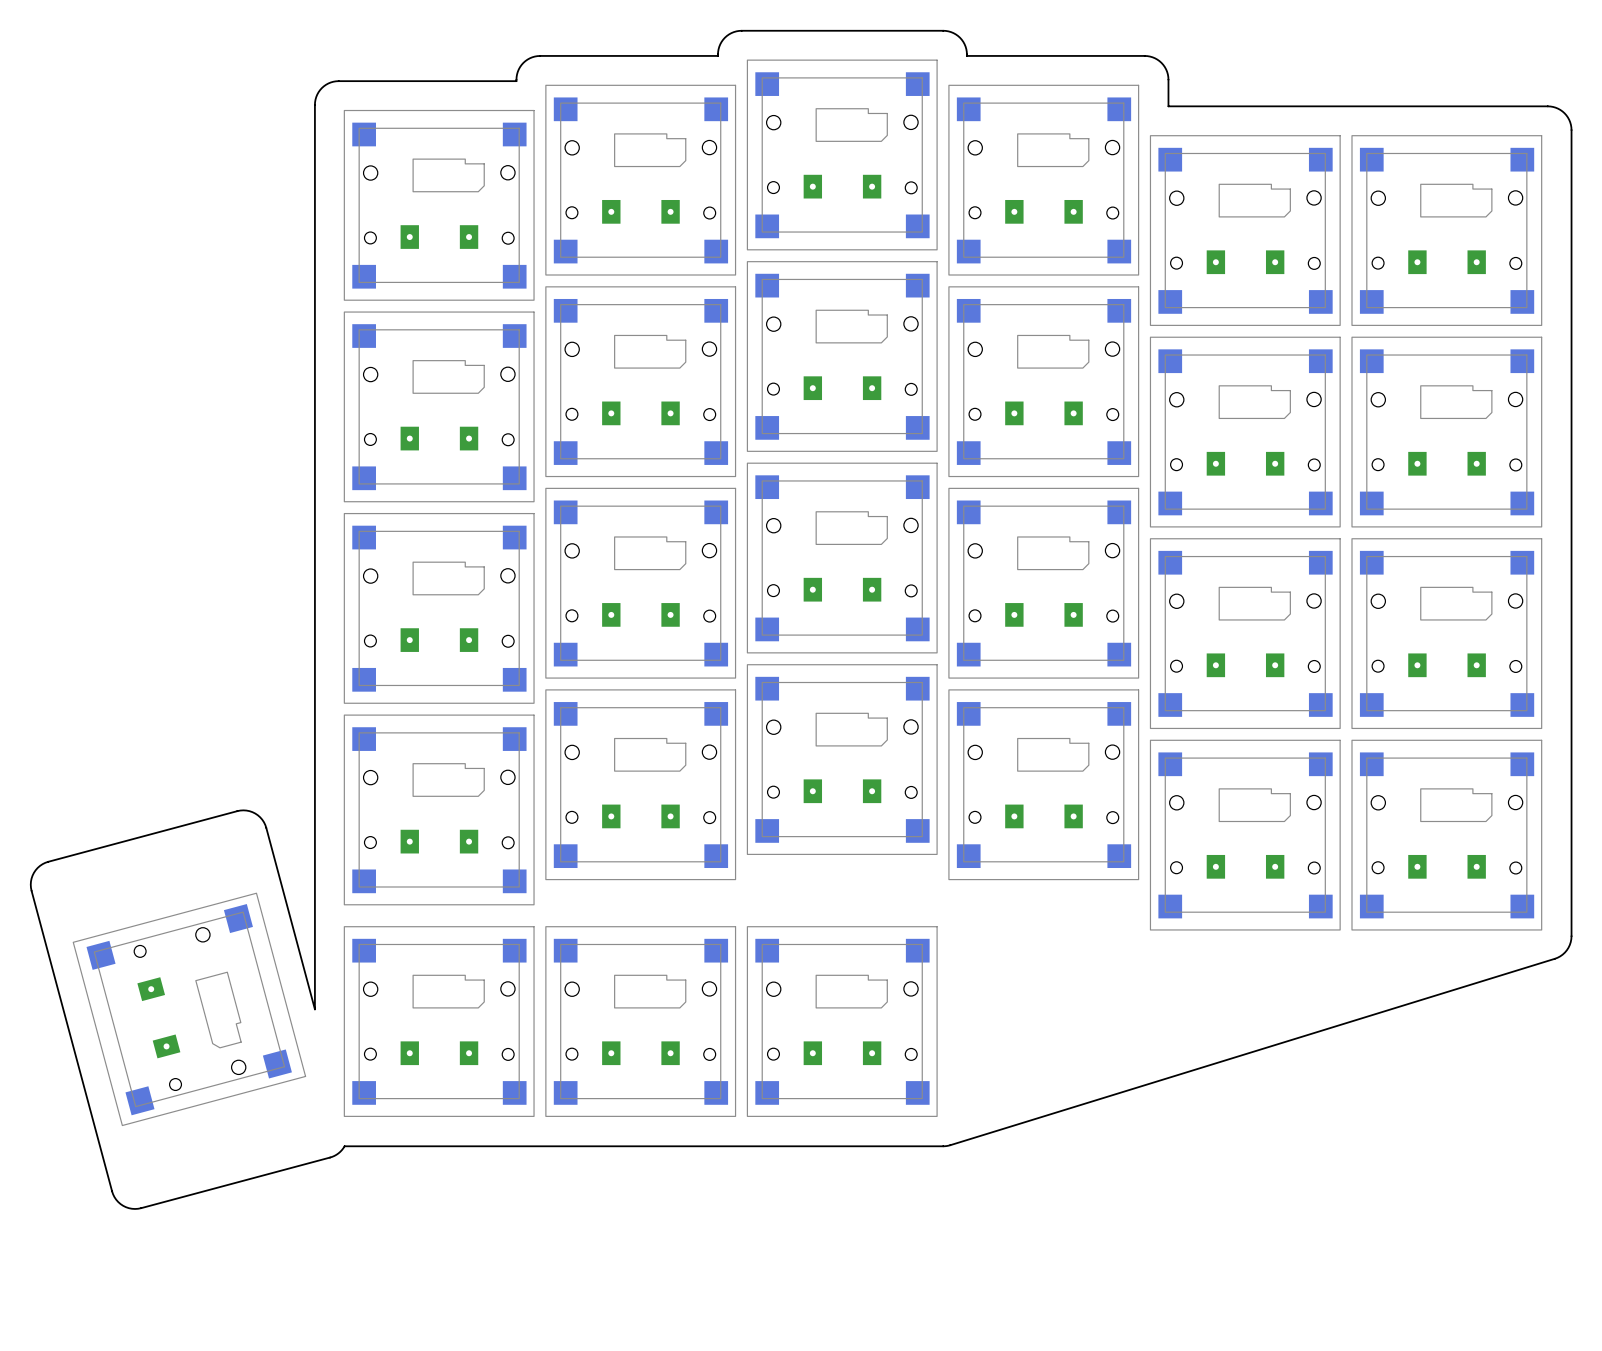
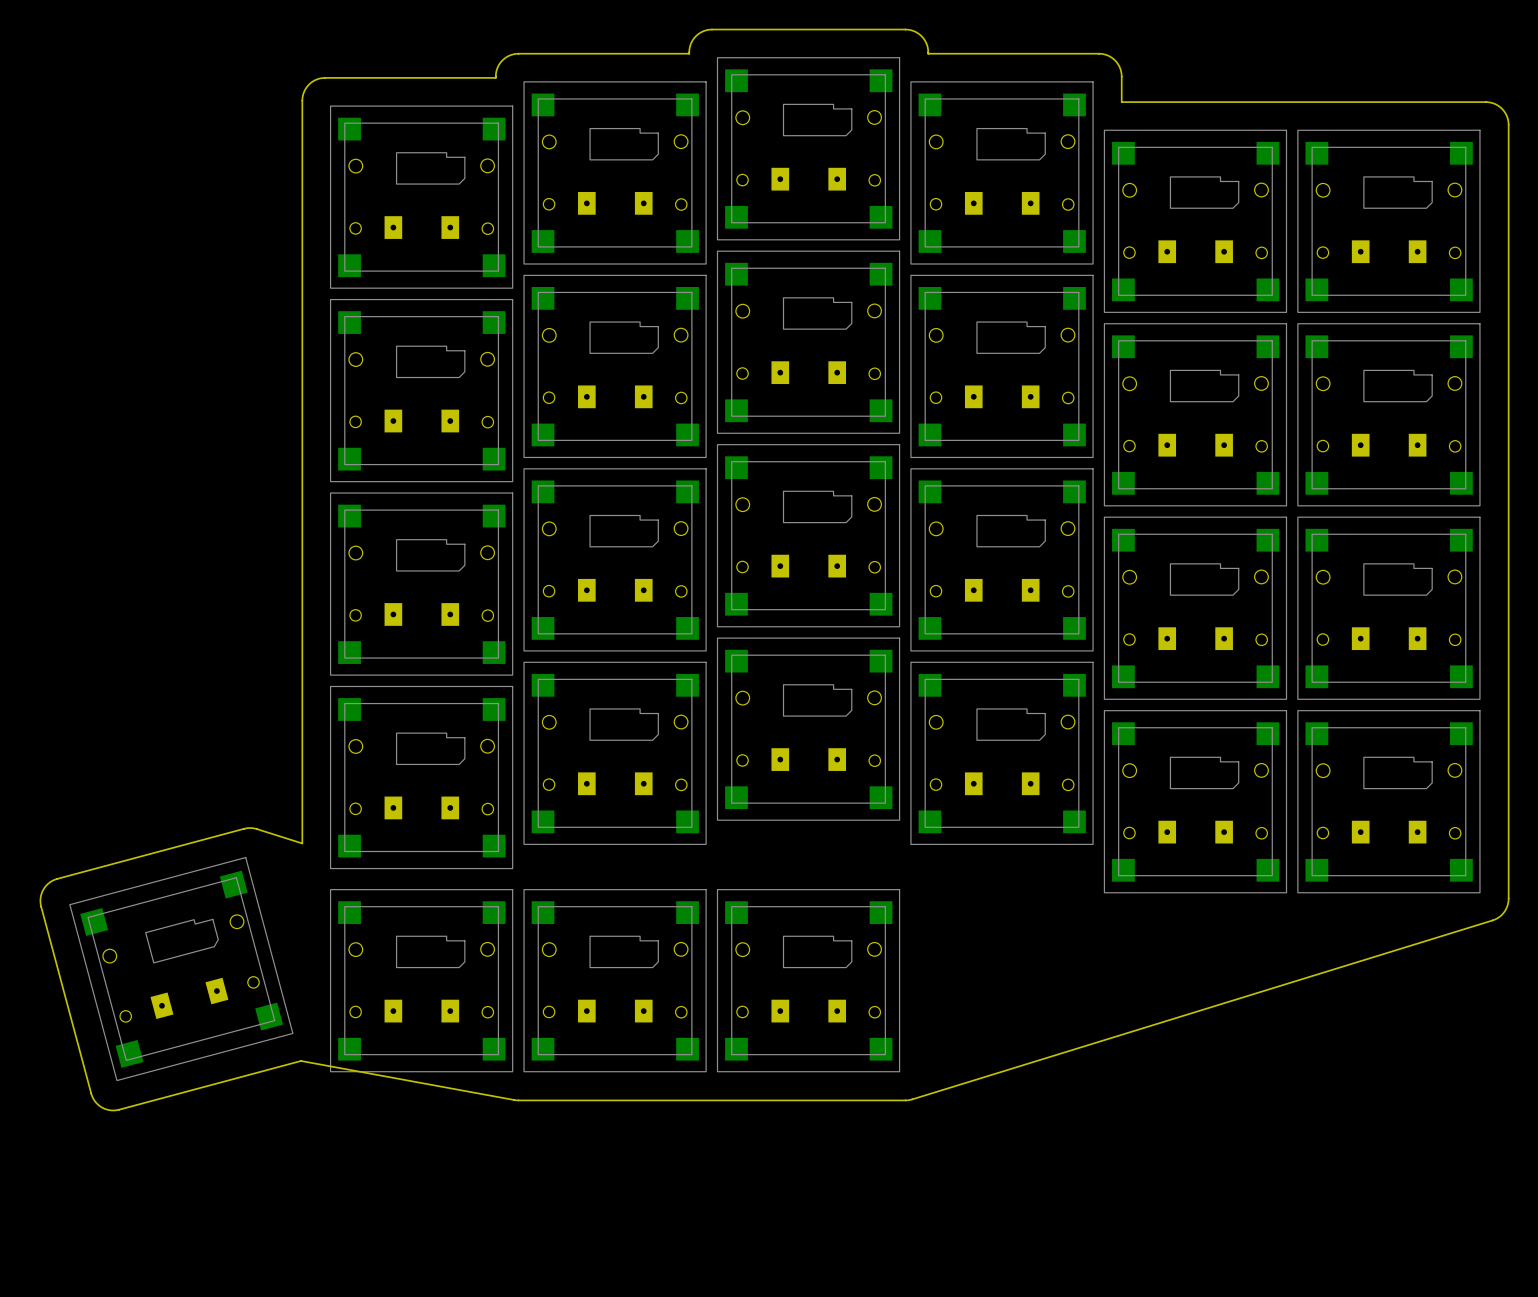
board edge: (314, 878) (314, 1009) (266, 827) (262, 819) (252, 812) (237, 811) (48, 861) (40, 865) (33, 872) (30, 881) (31, 890) (112, 1191) (116, 1199) (128, 1208) (141, 1208) (330, 1157) (338, 1153) (344, 1146) (540, 1146) -> (302, 843) (256, 829) (246, 828) (57, 878) (44, 887) (40, 896) (41, 906) (91, 1093) (95, 1102) (104, 1108) (116, 1110) (301, 1060) (518, 1100)
part rotation: 0° (189, 1009) -> 90° counterclockwise (181, 969)

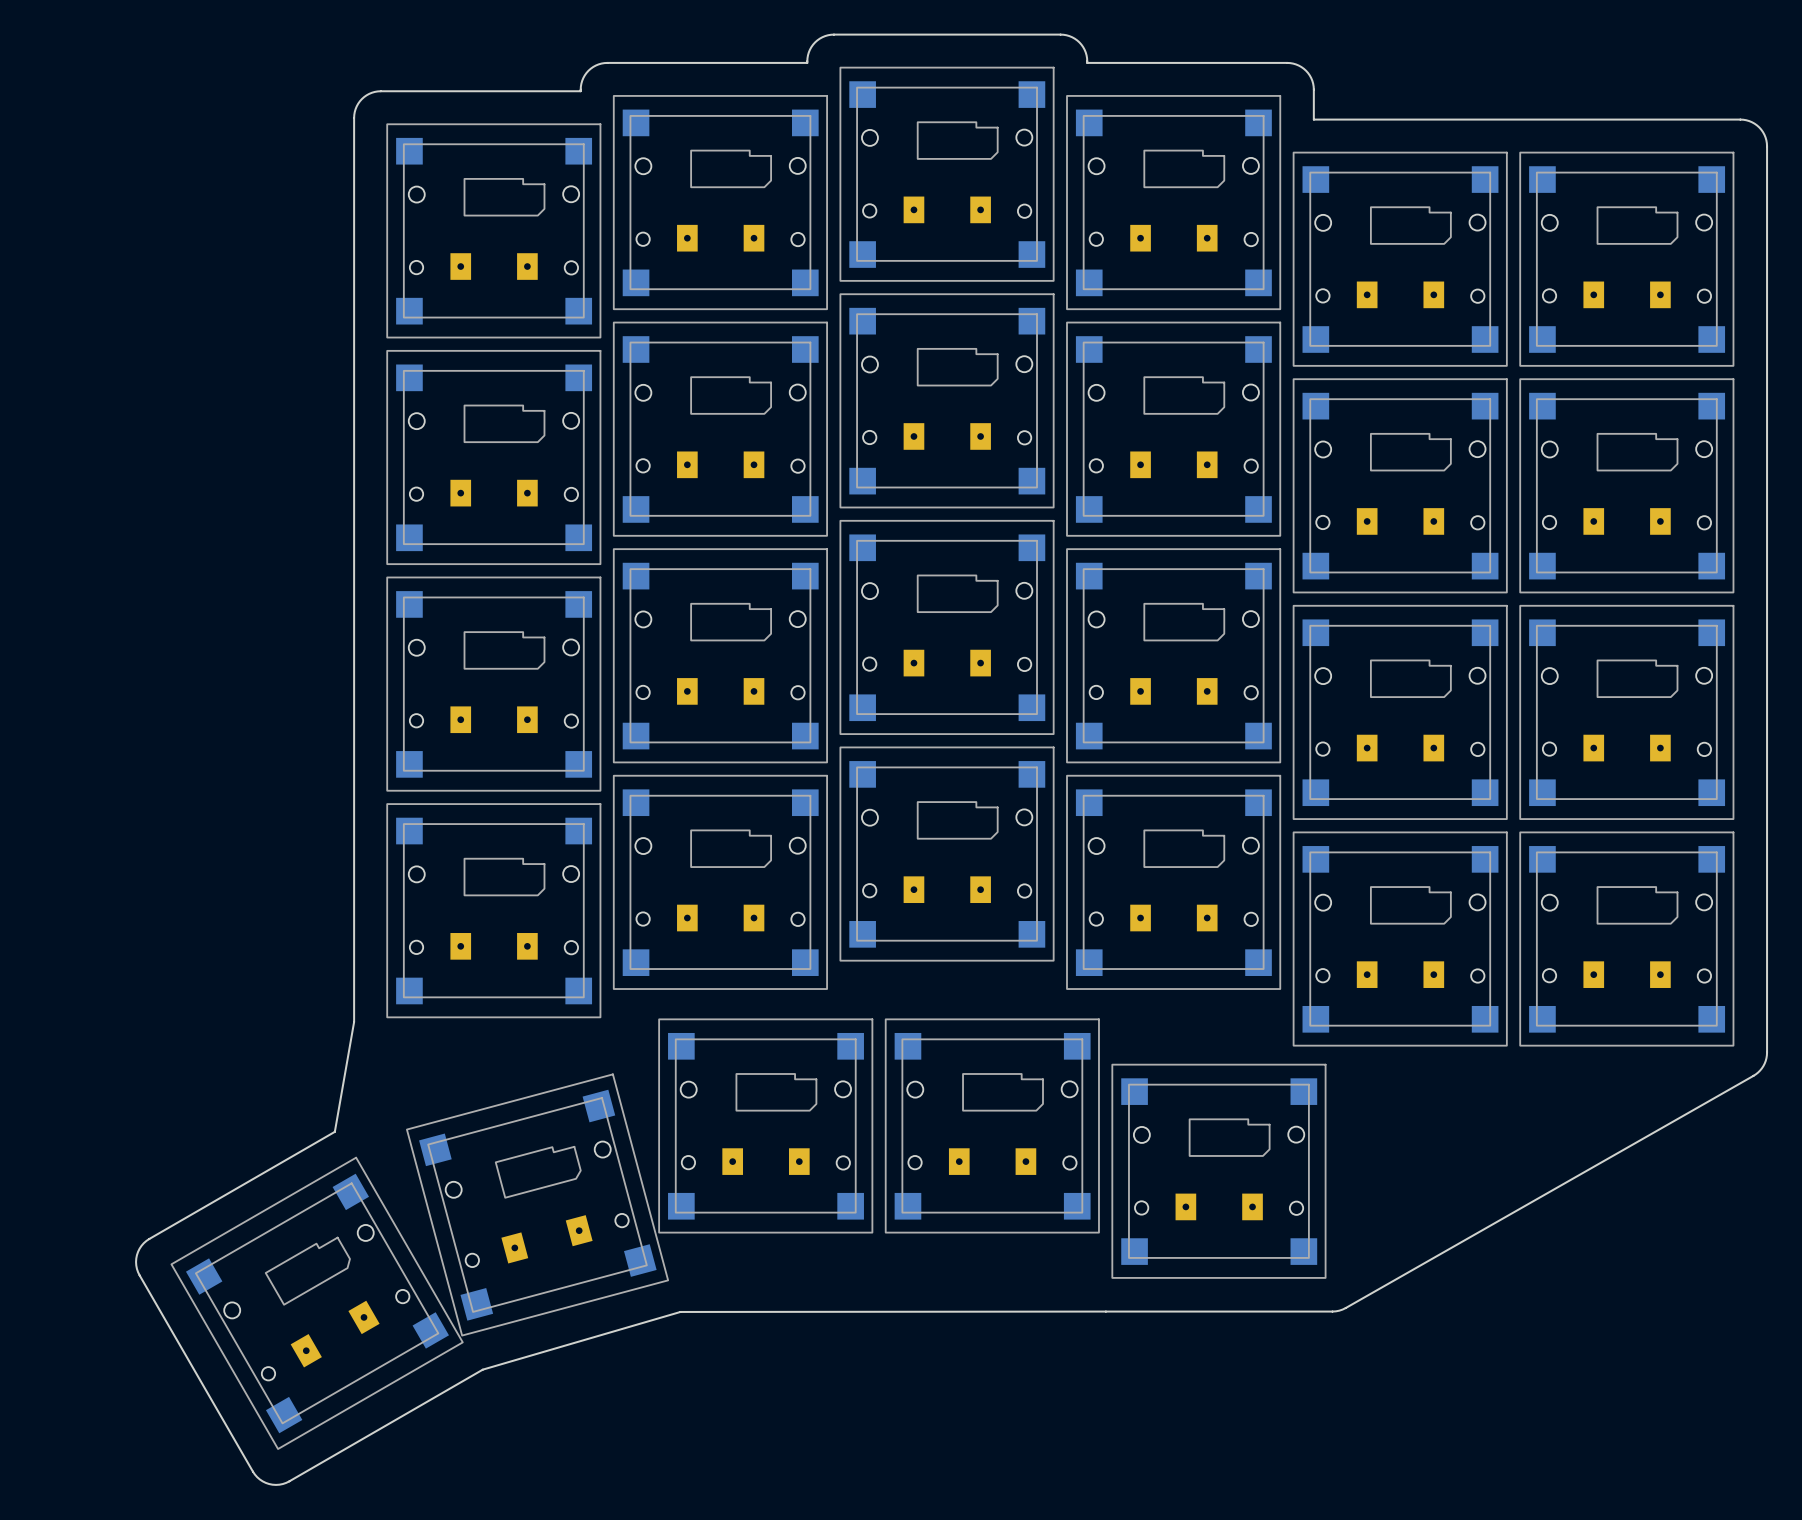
board edge: (302, 843) (256, 829) (246, 828) (57, 878) (44, 887) (40, 896) (41, 906) (91, 1093) (99, 1106) (109, 1110) (119, 1109) (301, 1060) (516, 1100) (908, 1100) (1492, 920) (1504, 912) (1508, 898) -> (354, 987) (354, 1021) (334, 1131) (149, 1238) (139, 1248) (136, 1258) (139, 1275) (252, 1471) (262, 1481) (272, 1484) (289, 1481) (482, 1369) (680, 1311) (1339, 1310) (1753, 1075) (1763, 1066) (1767, 1052)
part position: (181, 969) -> (537, 1204)
part: (421, 980) -> none
part position: (615, 980) -> (765, 1125)
part position: (808, 980) -> (992, 1125)
part: none -> (1218, 1171)
part: none -> (317, 1303)

